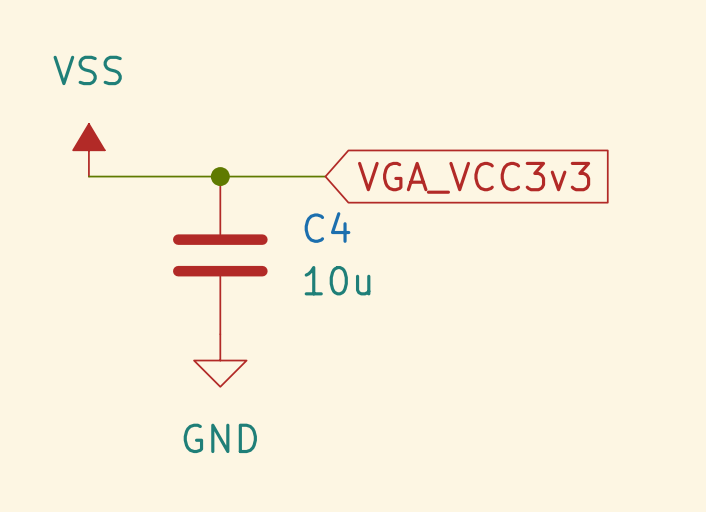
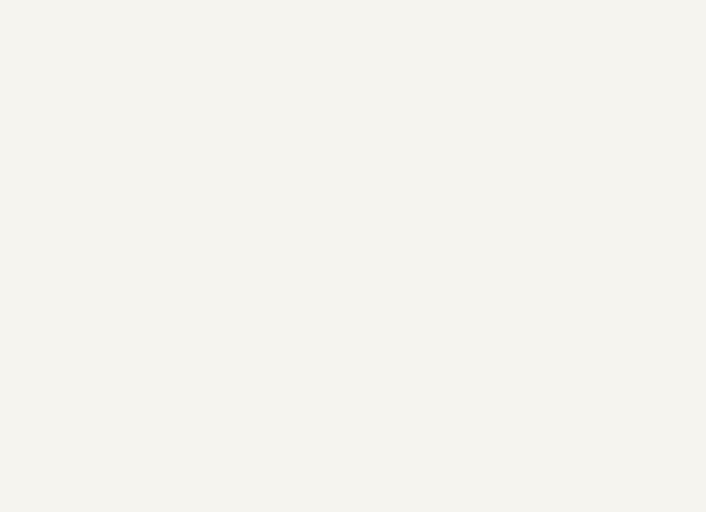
power symbol: VSS (88, 150) -> none
wire: (88, 176) (325, 176) -> none
junction: (220, 176) -> none
global label: VGA_VCC3v3 (474, 177) -> none
C4: 10u (220, 255) -> none
power symbol: GND (220, 360) -> none

